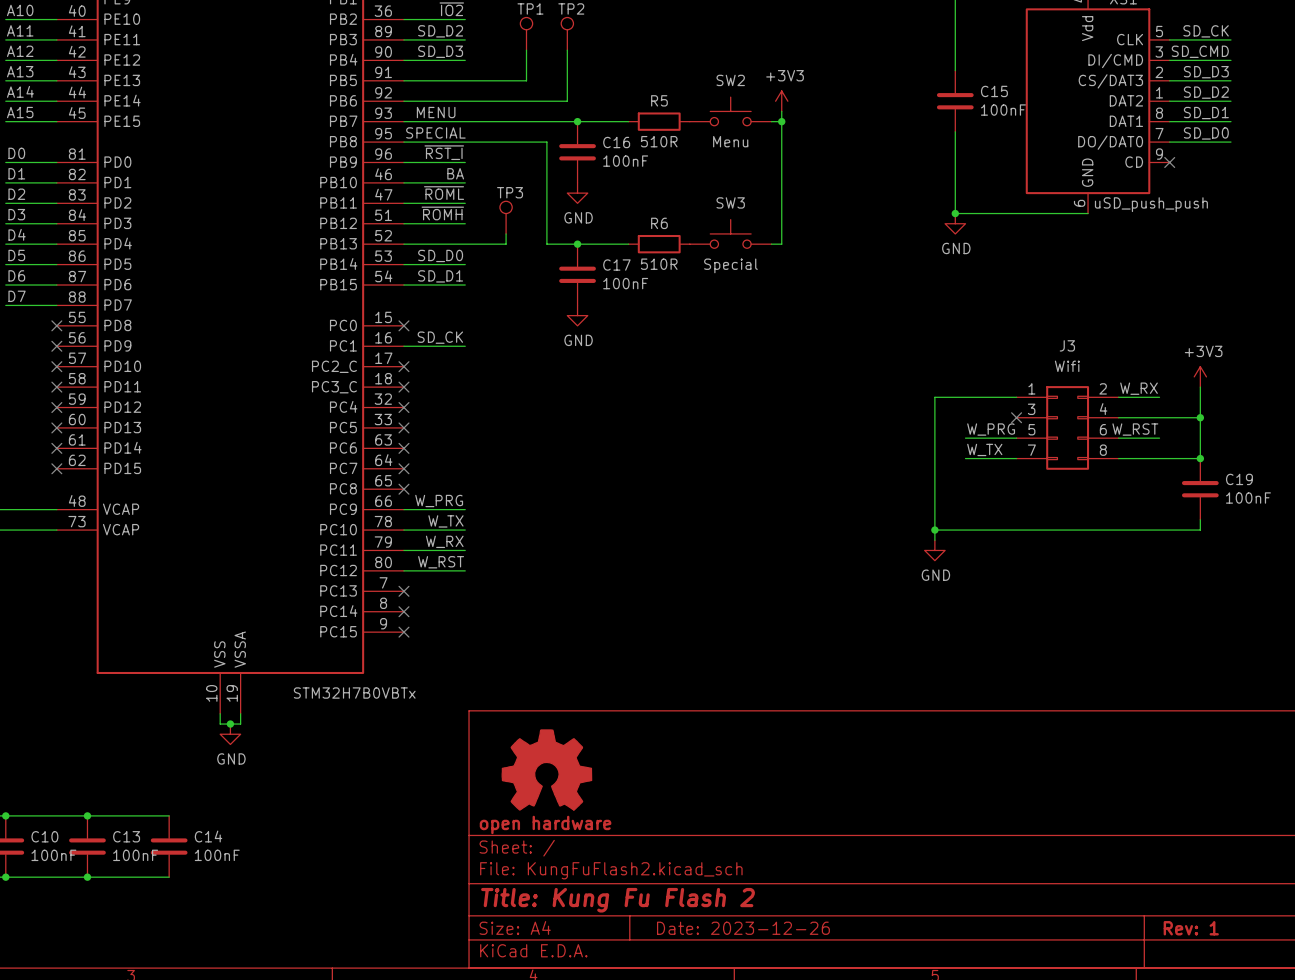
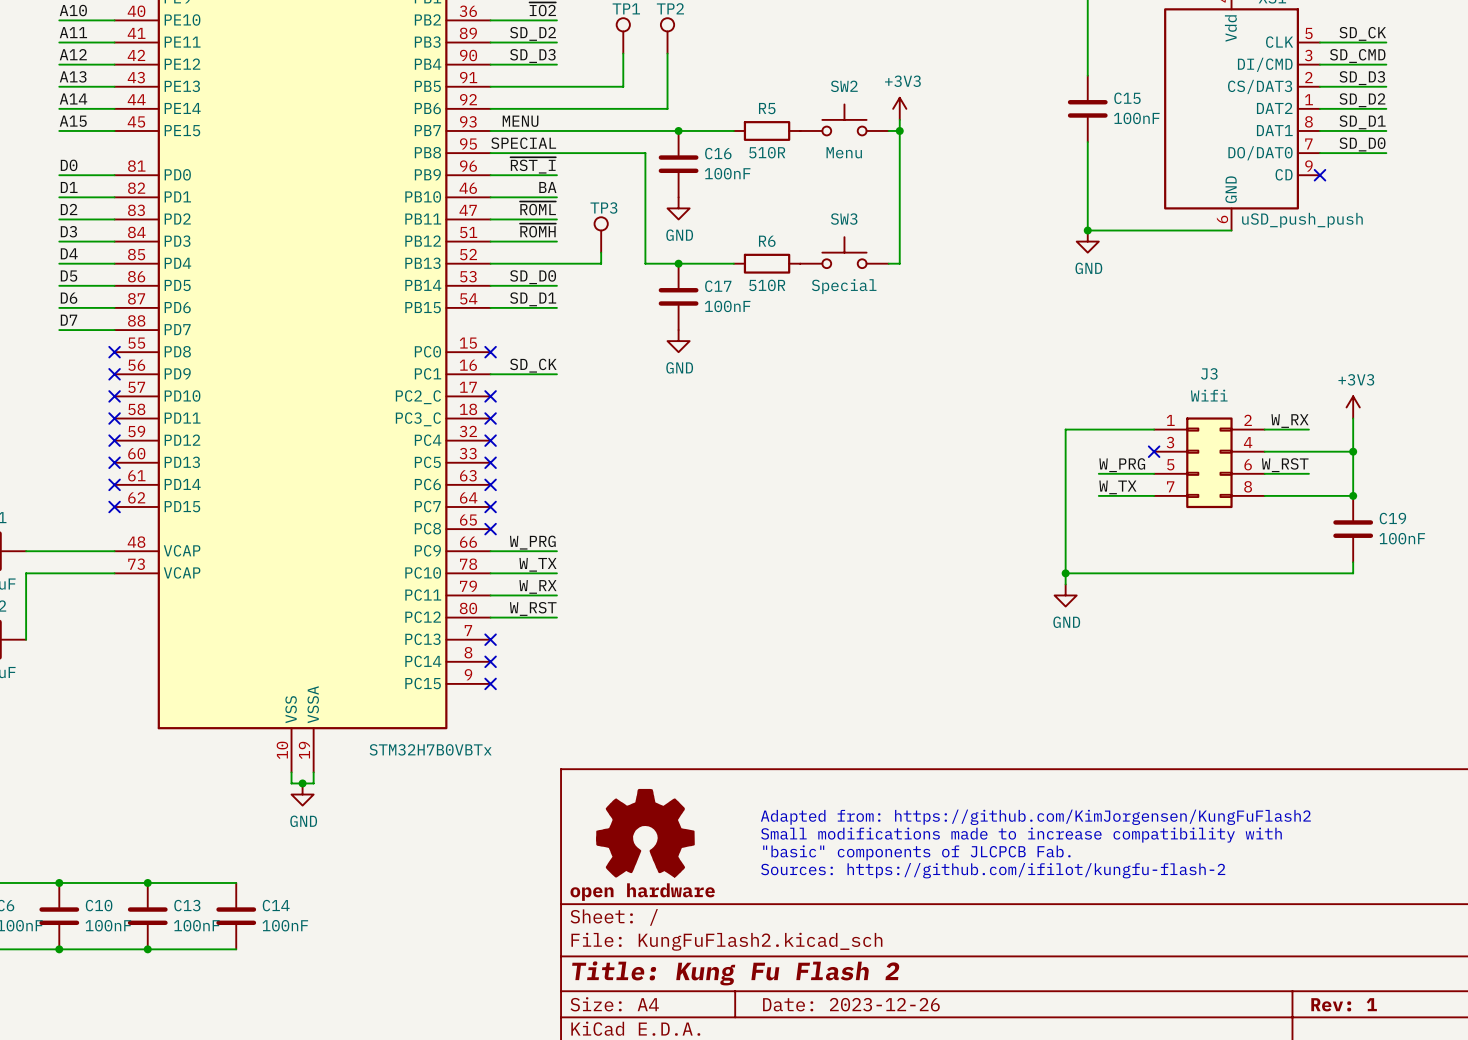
text: none -> Adapted from: https://github.com/KimJorgensen/KungFuFlash2 (1035, 817)
text: none -> Small modifications made to increase compatibility with (1021, 835)
text: none -> "basic" components of JLCPCB Fab. (916, 852)
text: none -> Sources: https://github.com/ifilot/kungfu-flash-2 (993, 870)

